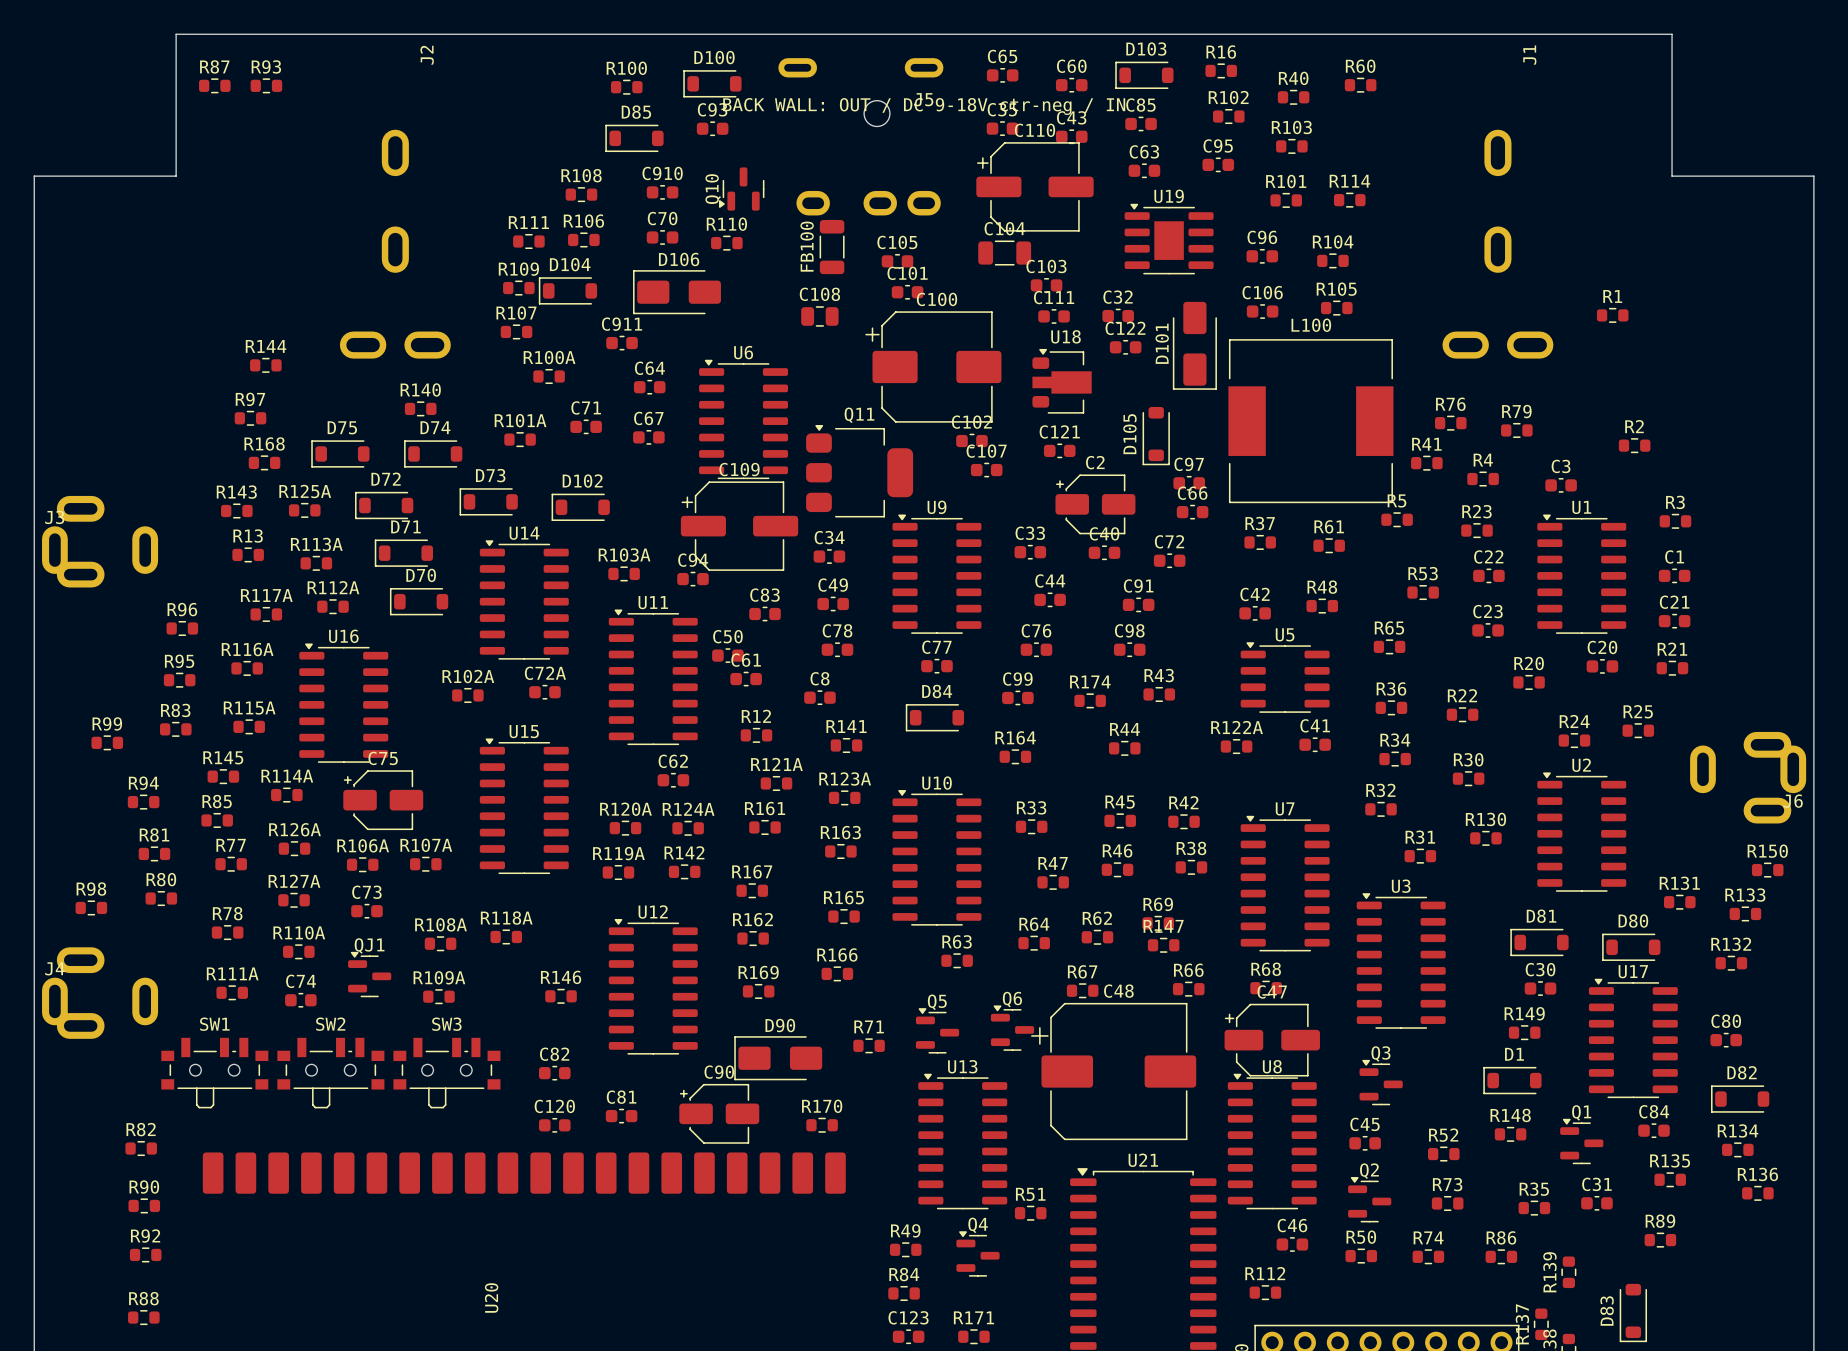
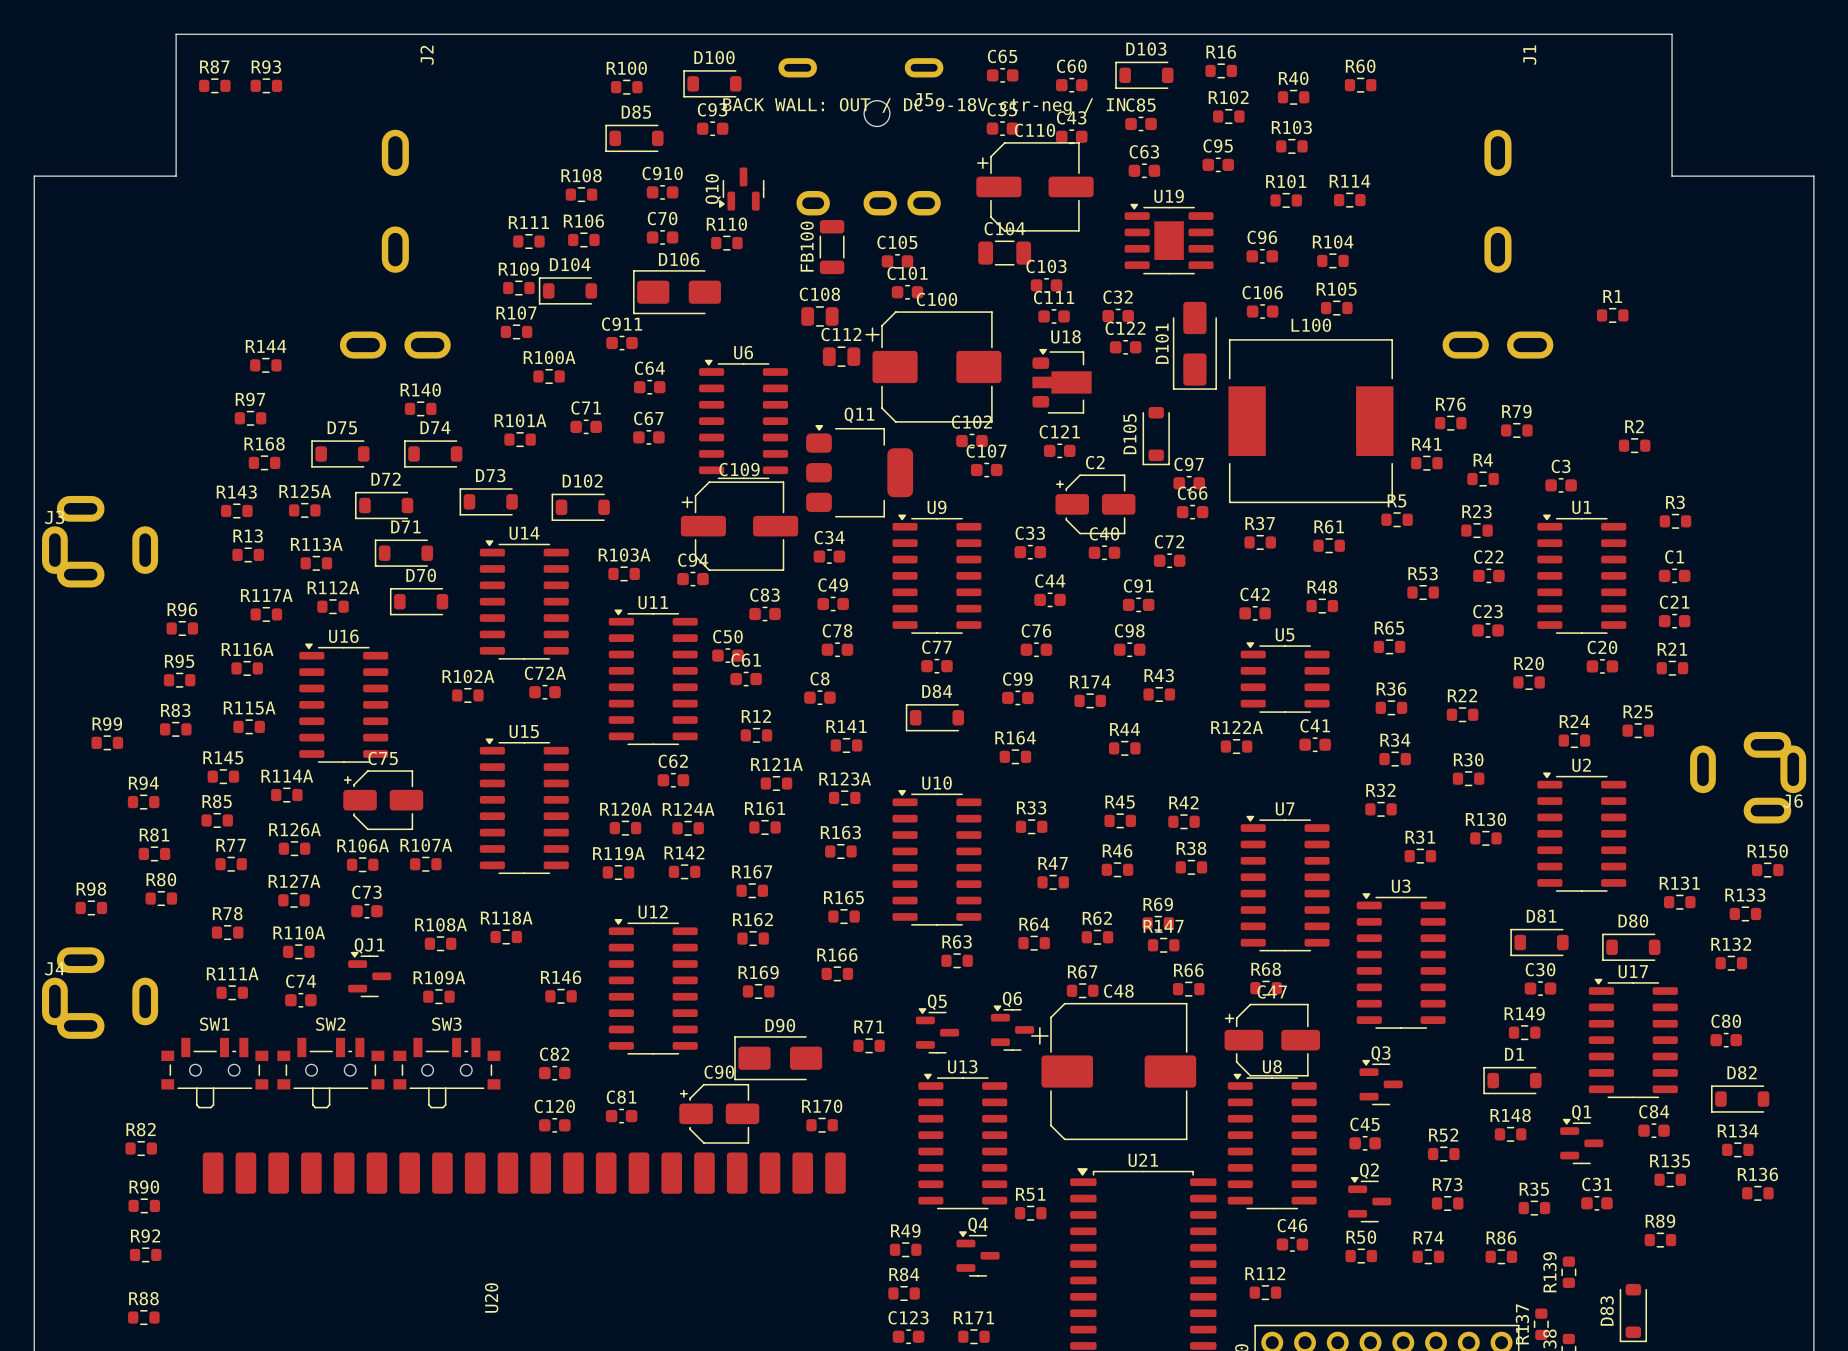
C112: none -> (841, 356)

